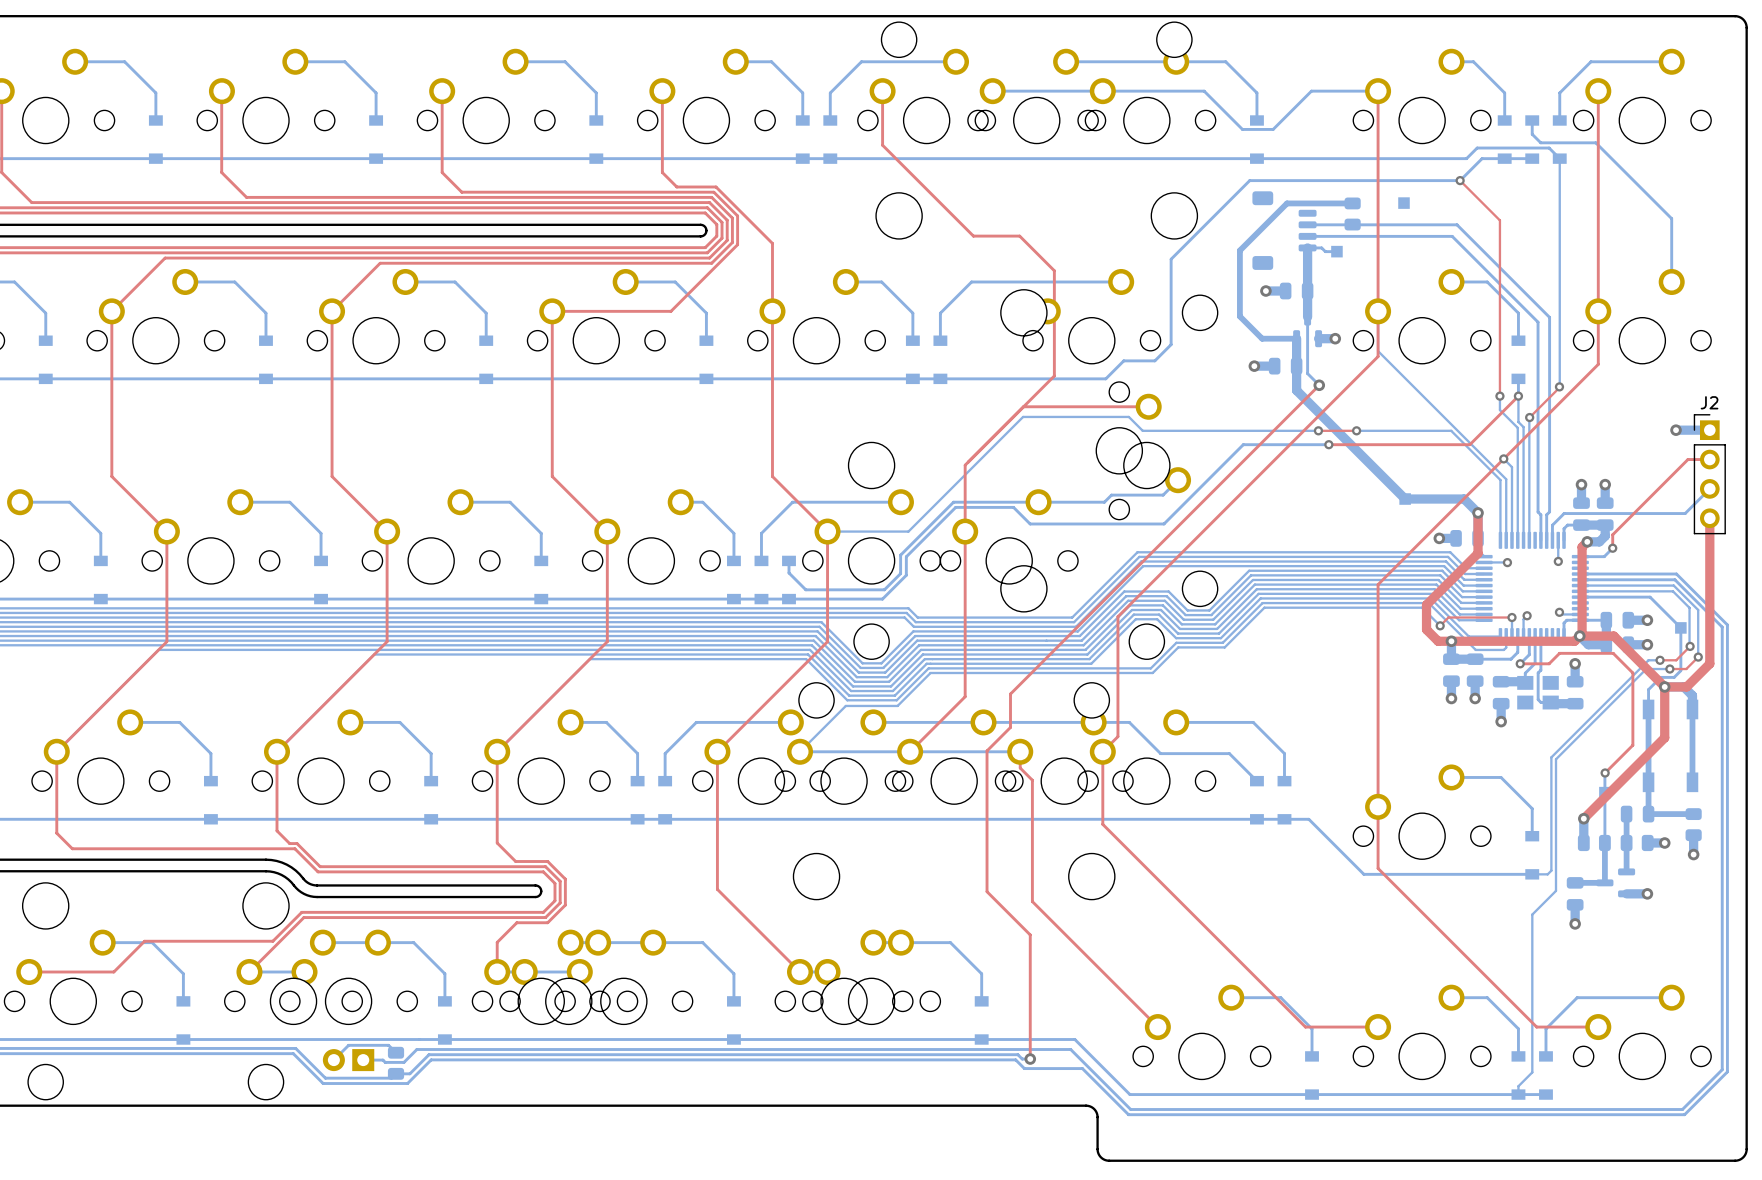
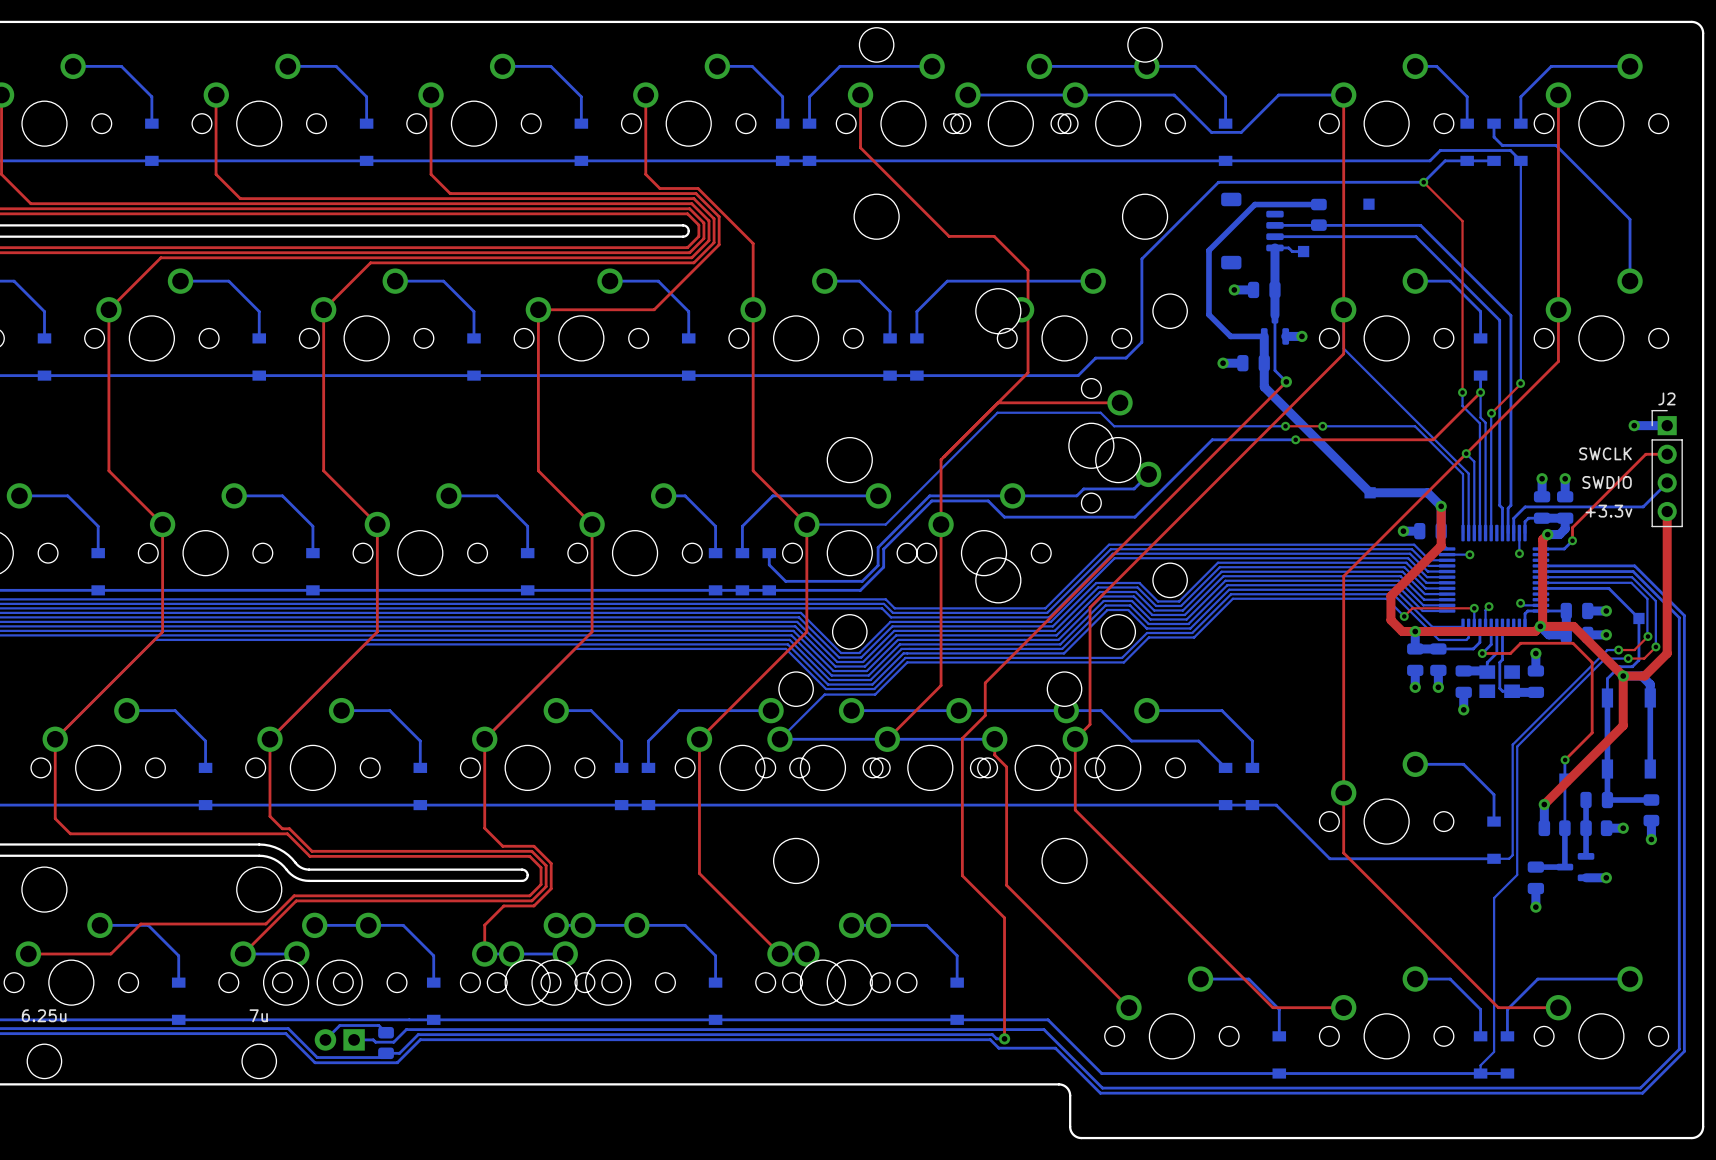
text: none -> SWCLK (1605, 453)
text: none -> SWDIO (1607, 482)
text: none -> +3.3v (1608, 511)
text: none -> 6.25u (44, 1015)
text: none -> 7u (258, 1015)

